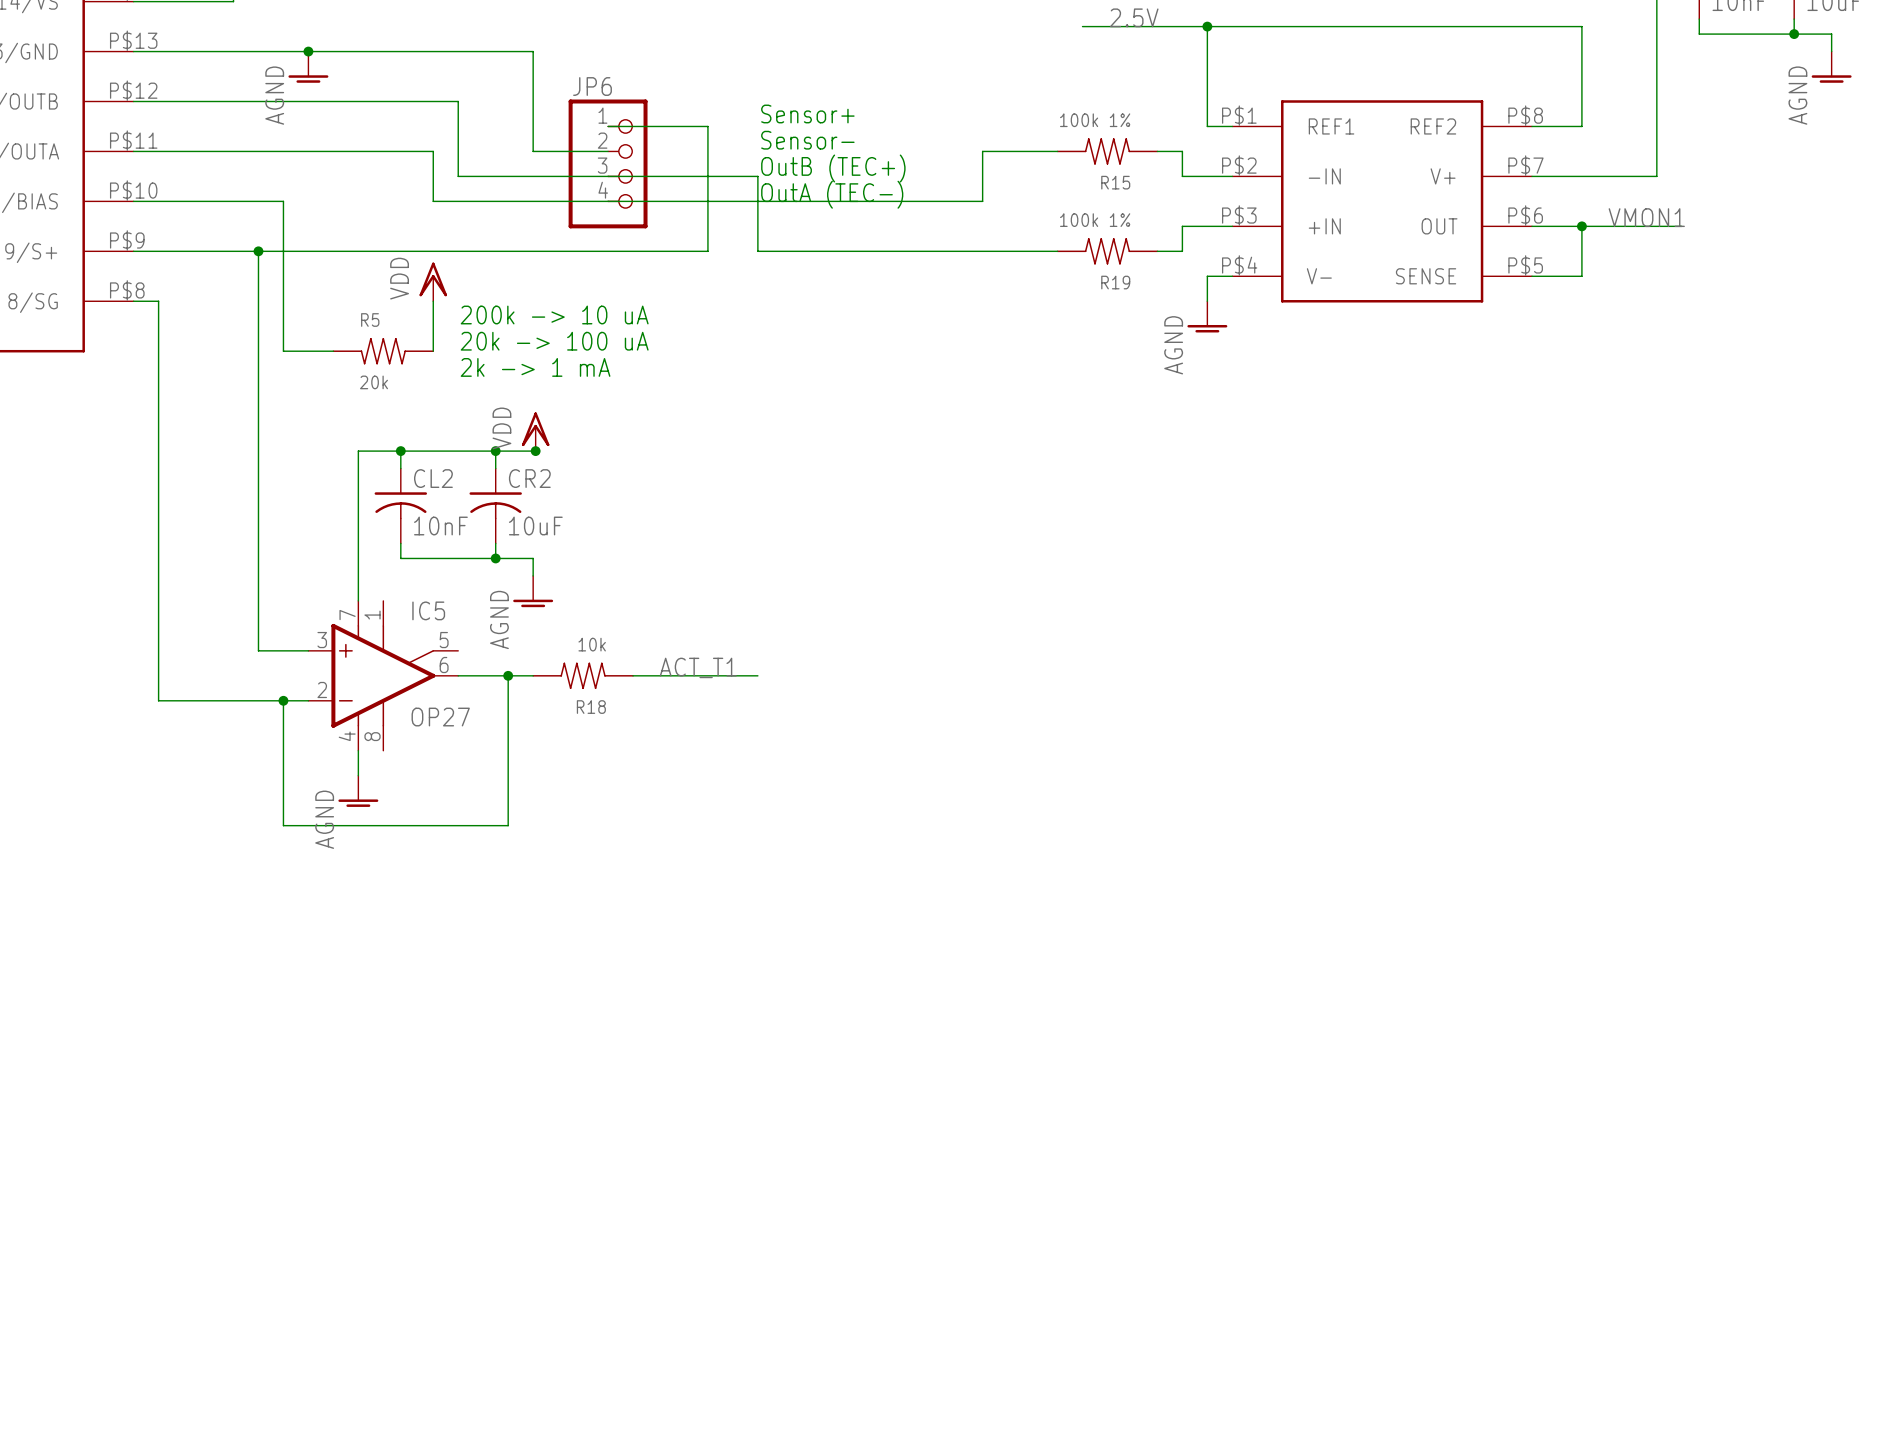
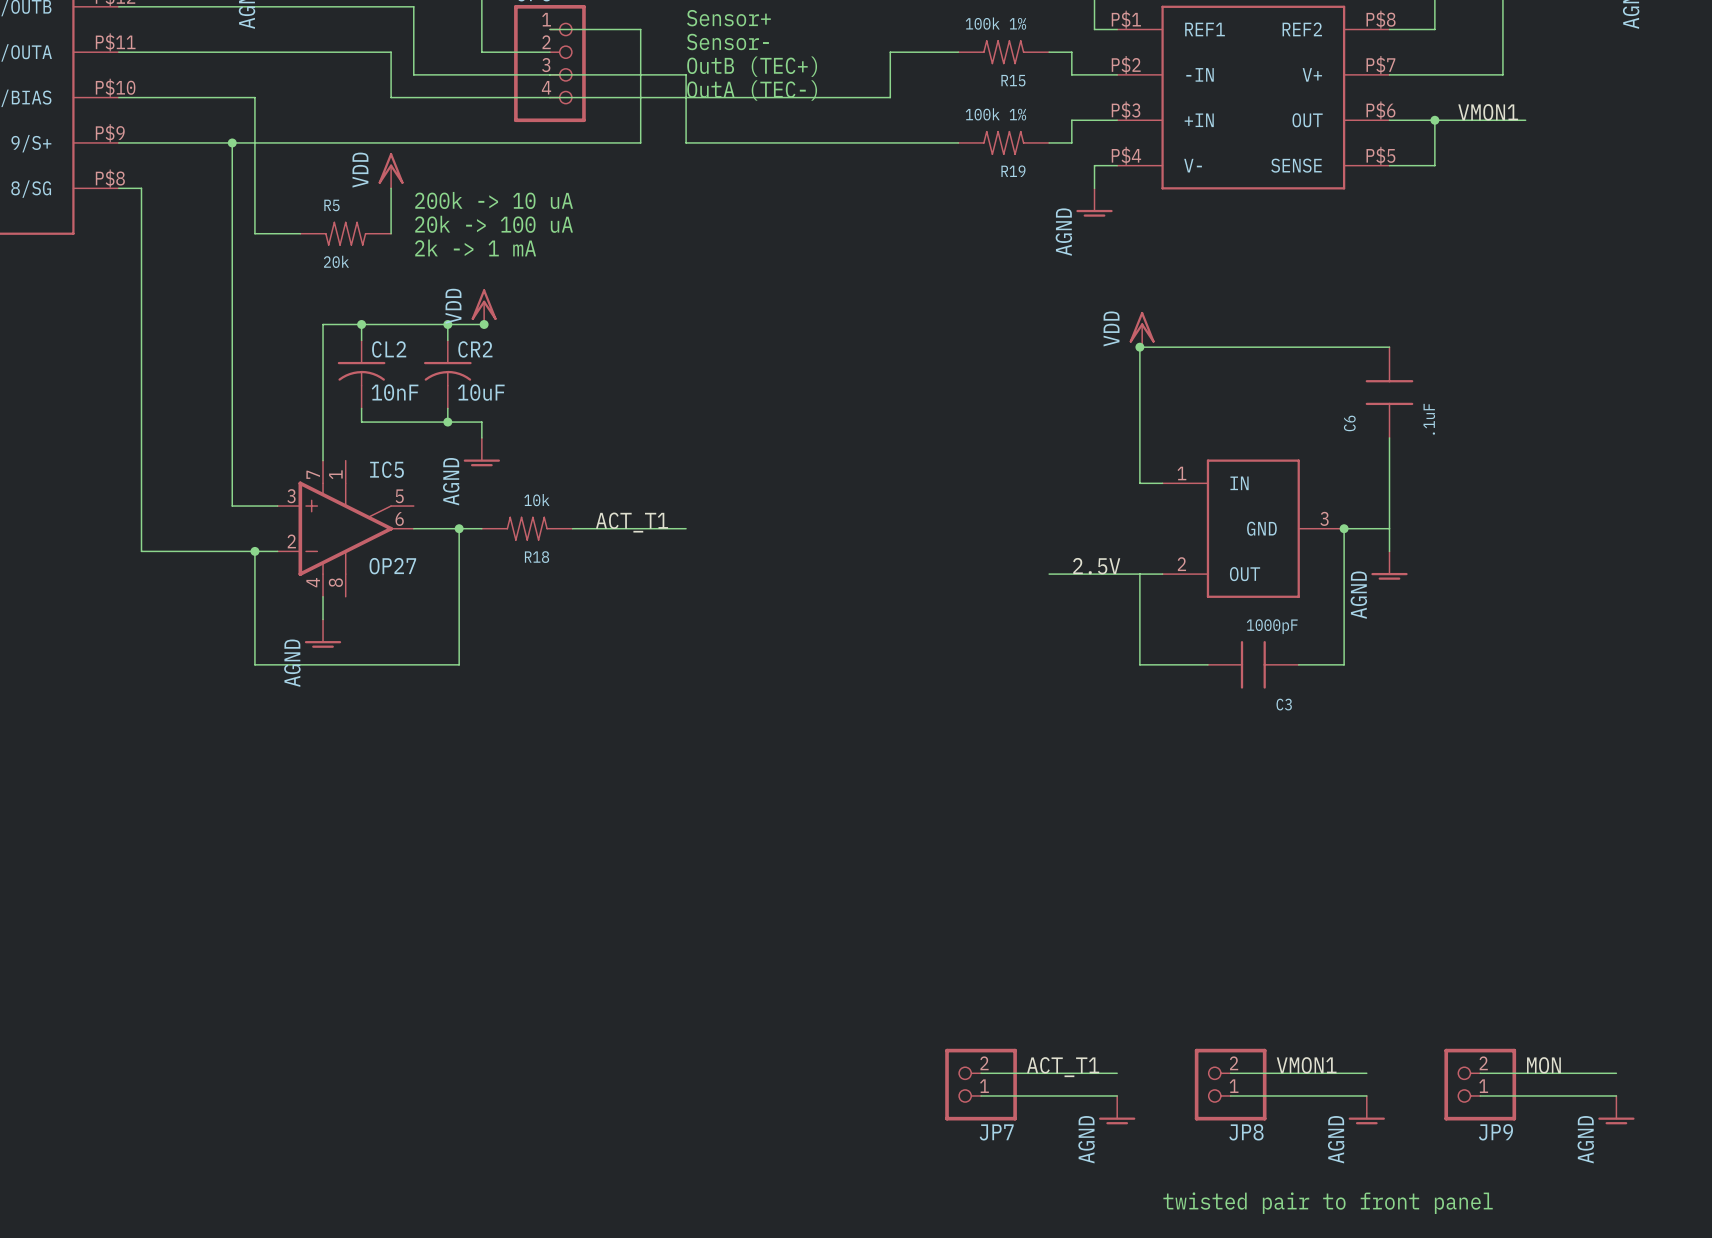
power symbol: none -> VDD (1142, 329)
junction: none -> (1139, 347)
wire: none -> (1389, 347) (1139, 347) (1139, 483) (1162, 483)
C6: none -> .1uF (1389, 392)
wire: none -> (1389, 437) (1389, 551)
part: none -> (1253, 528)
junction: none -> (1344, 528)
wire: none -> (1389, 528) (1344, 528) (1344, 664) (1298, 664)
power symbol: none -> AGND (1389, 565)
label: none -> 2.5V (1096, 566)
wire: none -> (1049, 574) (1162, 574)
wire: none -> (1139, 574) (1139, 664) (1207, 664)
C3: none -> 1000pF (1253, 664)
label: none -> VMON1 (1306, 1065)
label: none -> MON (1543, 1065)
label: none -> ACT_T1 (1063, 1067)
wire: none -> (981, 1073) (1117, 1073)
wire: none -> (1230, 1073) (1366, 1073)
wire: none -> (1480, 1073) (1616, 1073)
JP7: none -> (981, 1084)
JP8: none -> (1230, 1084)
JP9: none -> (1480, 1084)
wire: none -> (981, 1095) (1117, 1095)
wire: none -> (1230, 1095) (1366, 1095)
wire: none -> (1480, 1095) (1616, 1095)
power symbol: none -> AGND (1117, 1110)
power symbol: none -> AGND (1366, 1110)
power symbol: none -> AGND (1616, 1110)
text: none -> twisted pair to front panel (1328, 1203)

